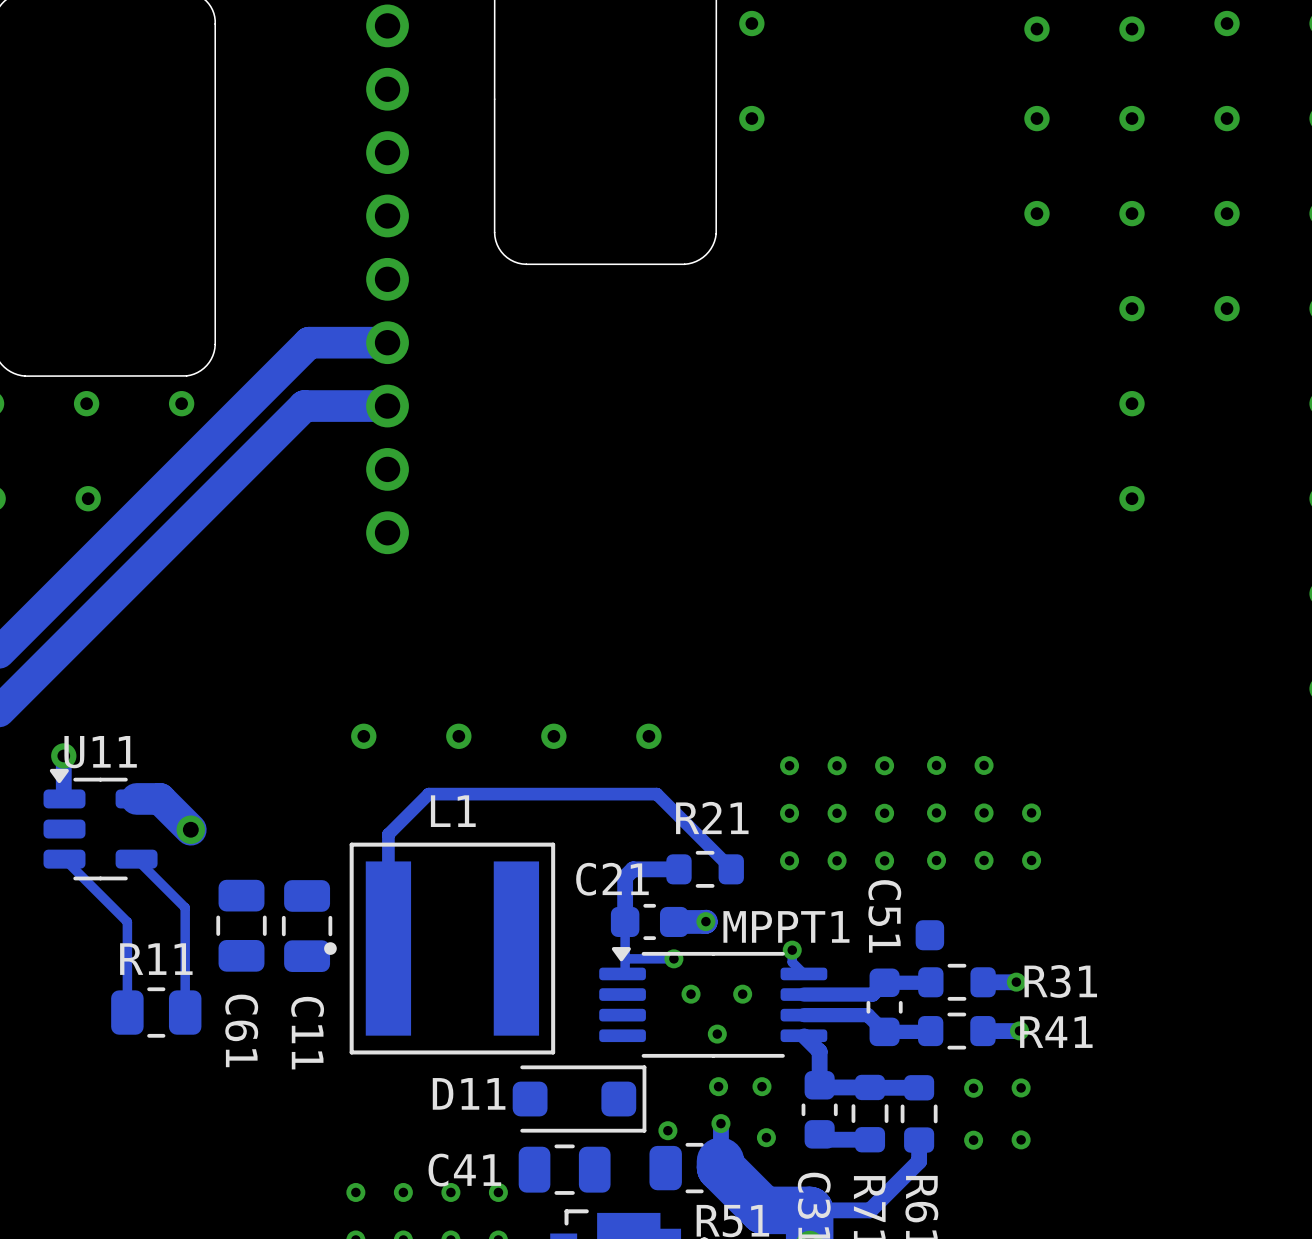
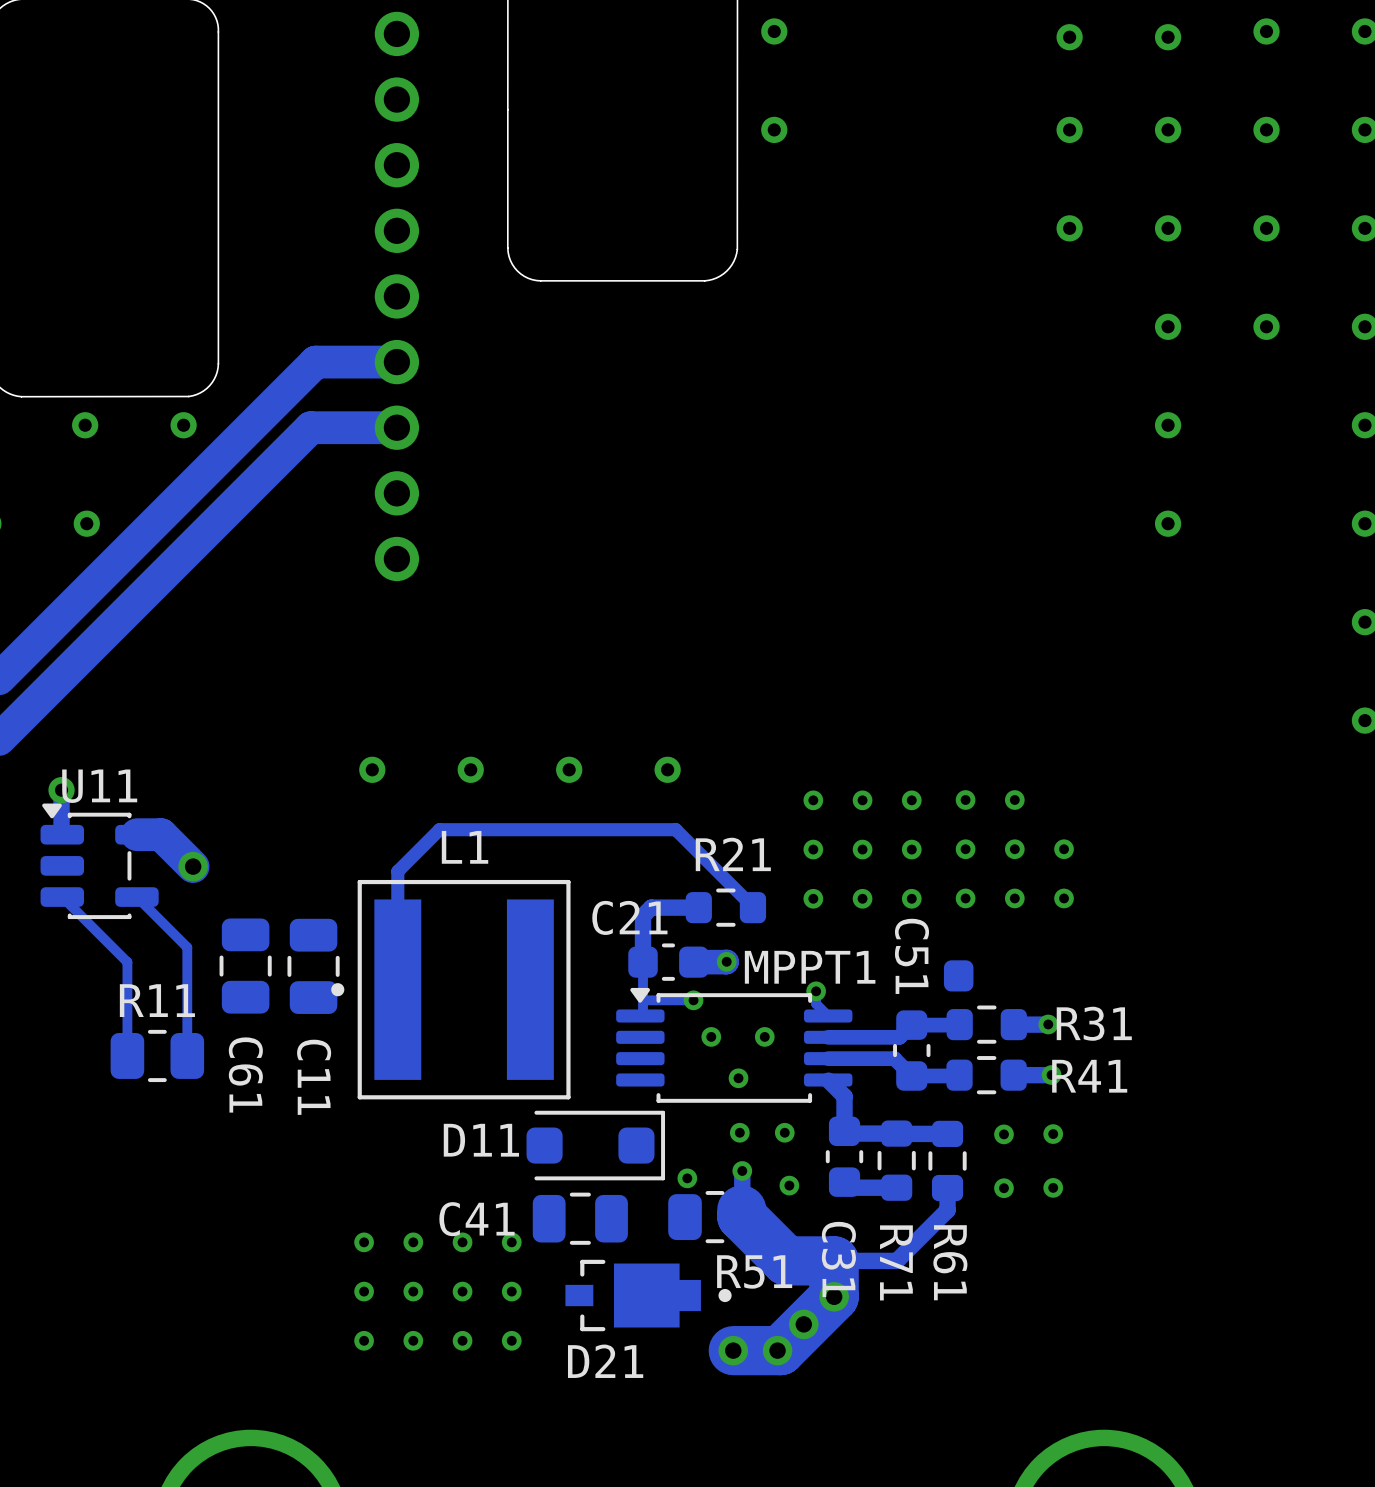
U11 footprint: [43, 768, 158, 881] -> [40, 803, 159, 920]
MPPT1 footprint: [599, 947, 828, 1058] -> [616, 987, 853, 1103]

